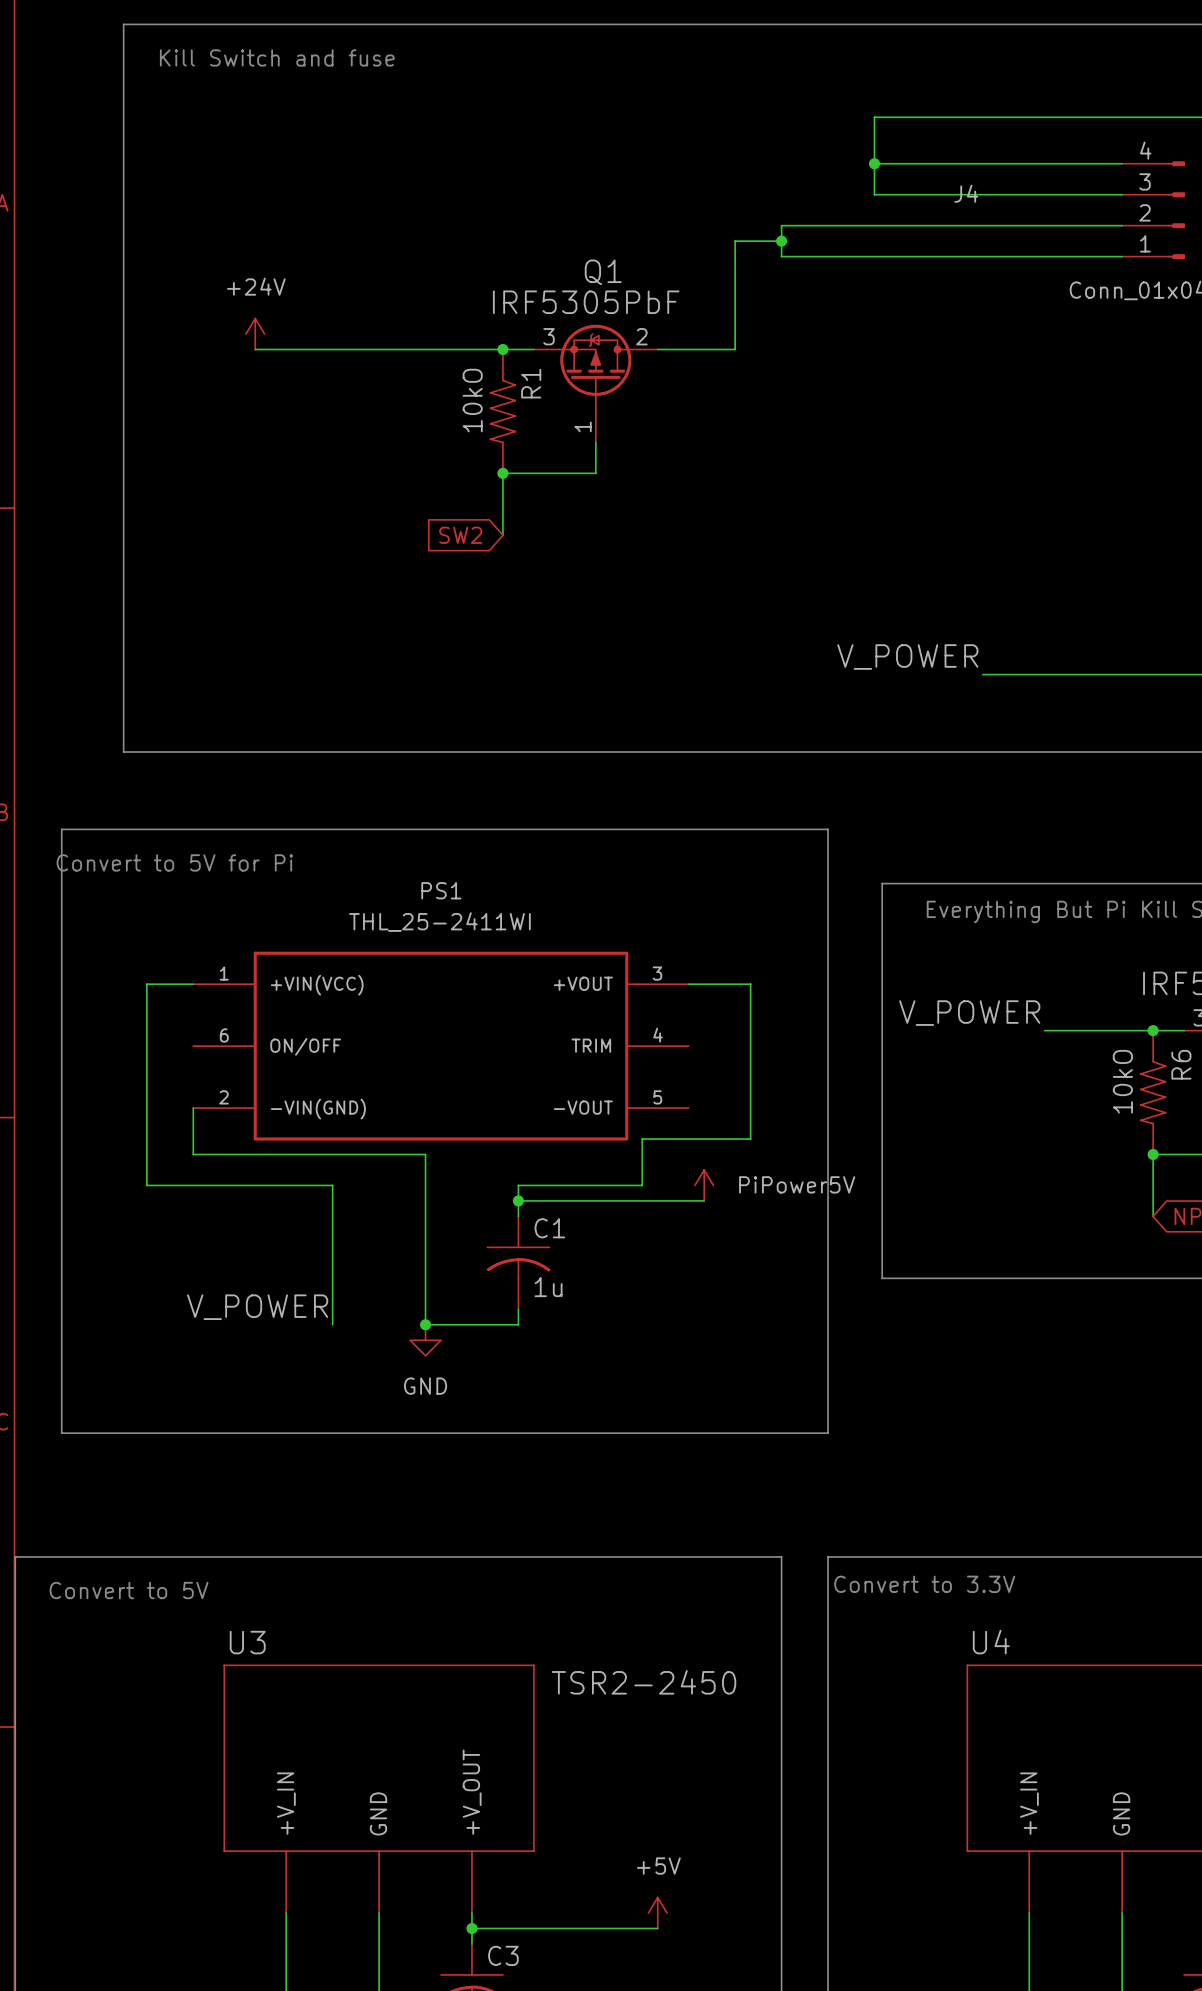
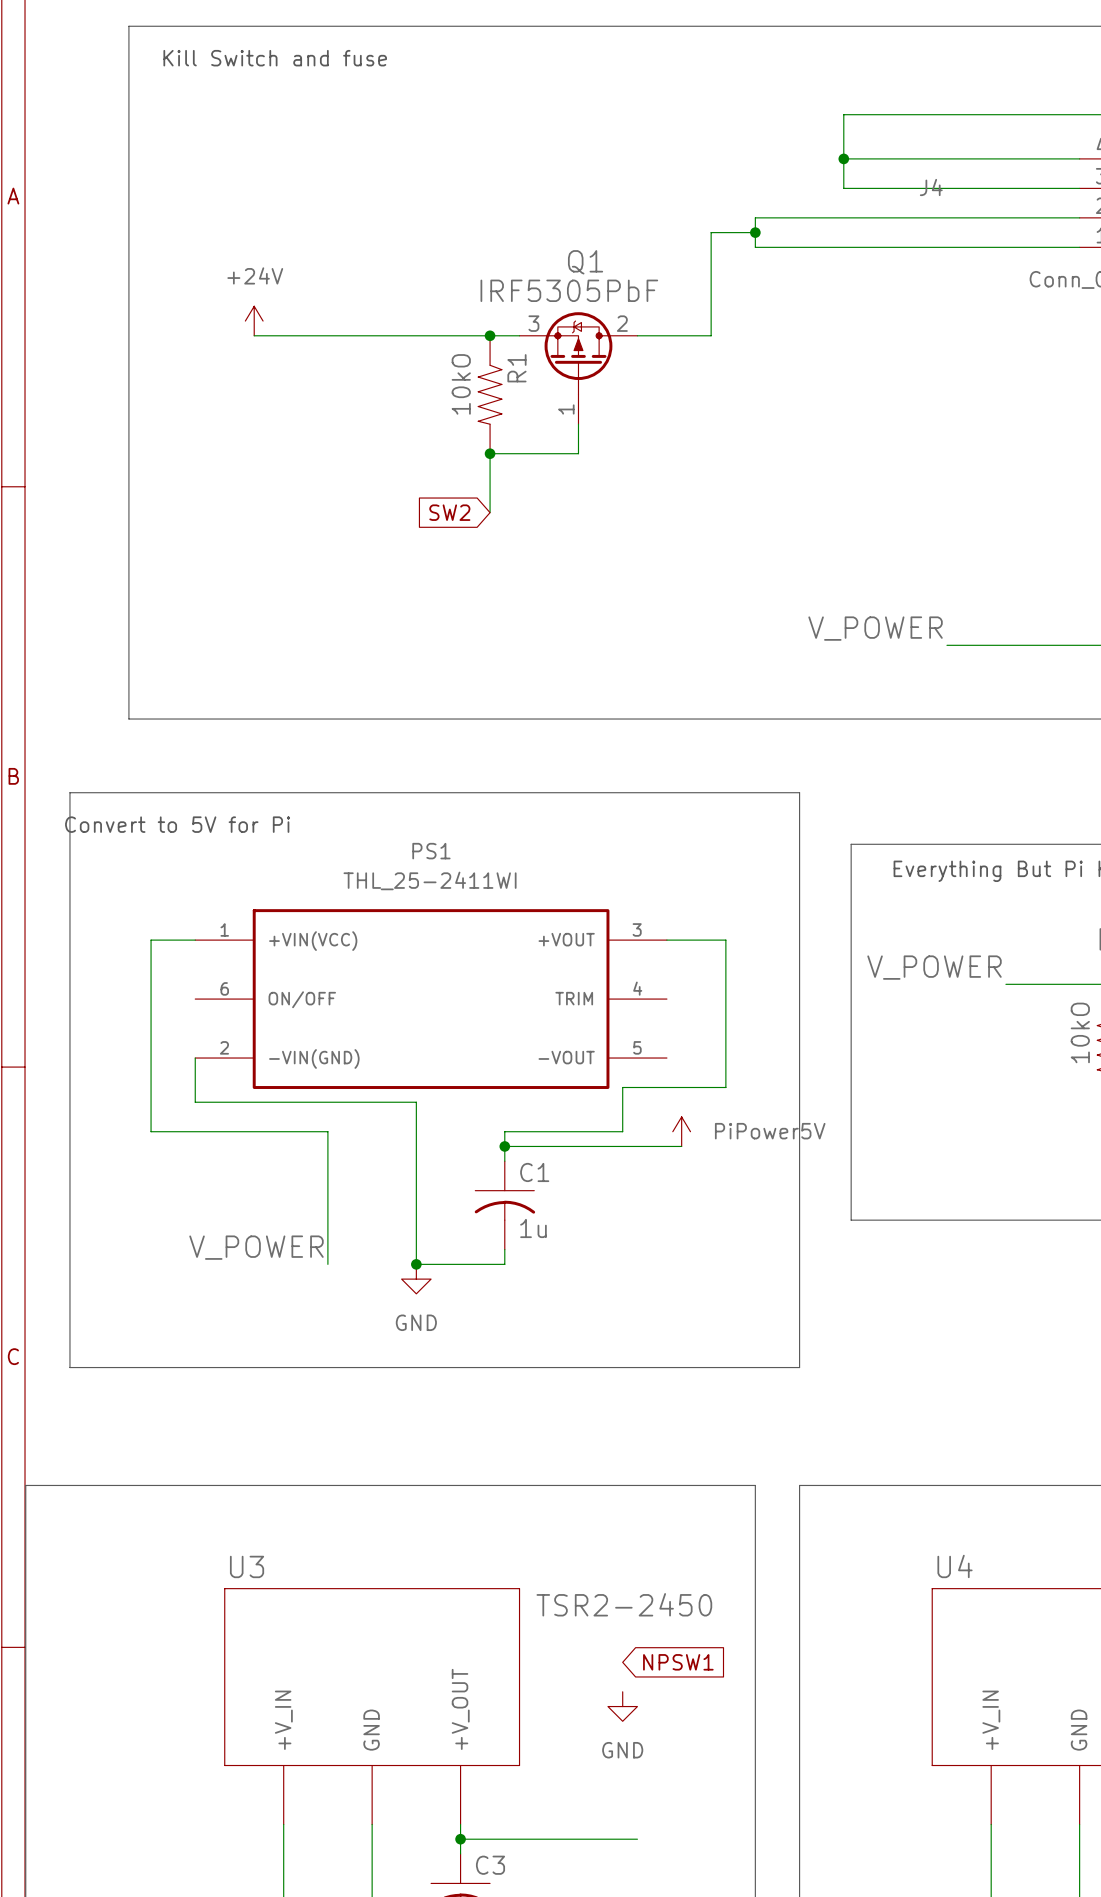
text: Convert to 3.3V (924, 1584) -> none
text: Convert to 5V (129, 1590) -> none
global label: none -> NPSW1 (678, 1662)
power symbol: none -> GND (622, 1706)
power symbol: +5V (657, 1913) -> none

